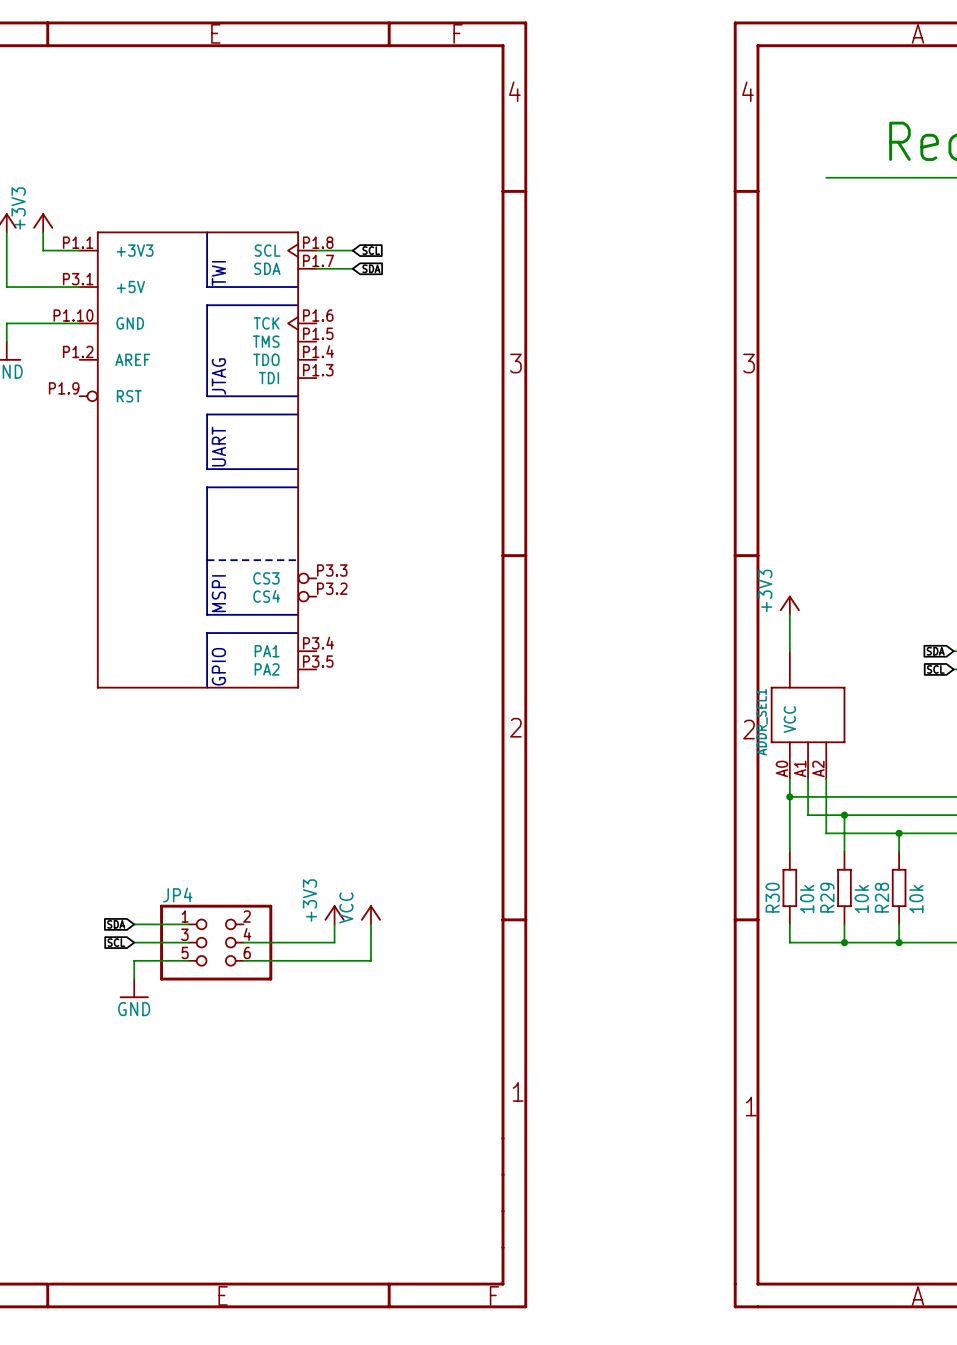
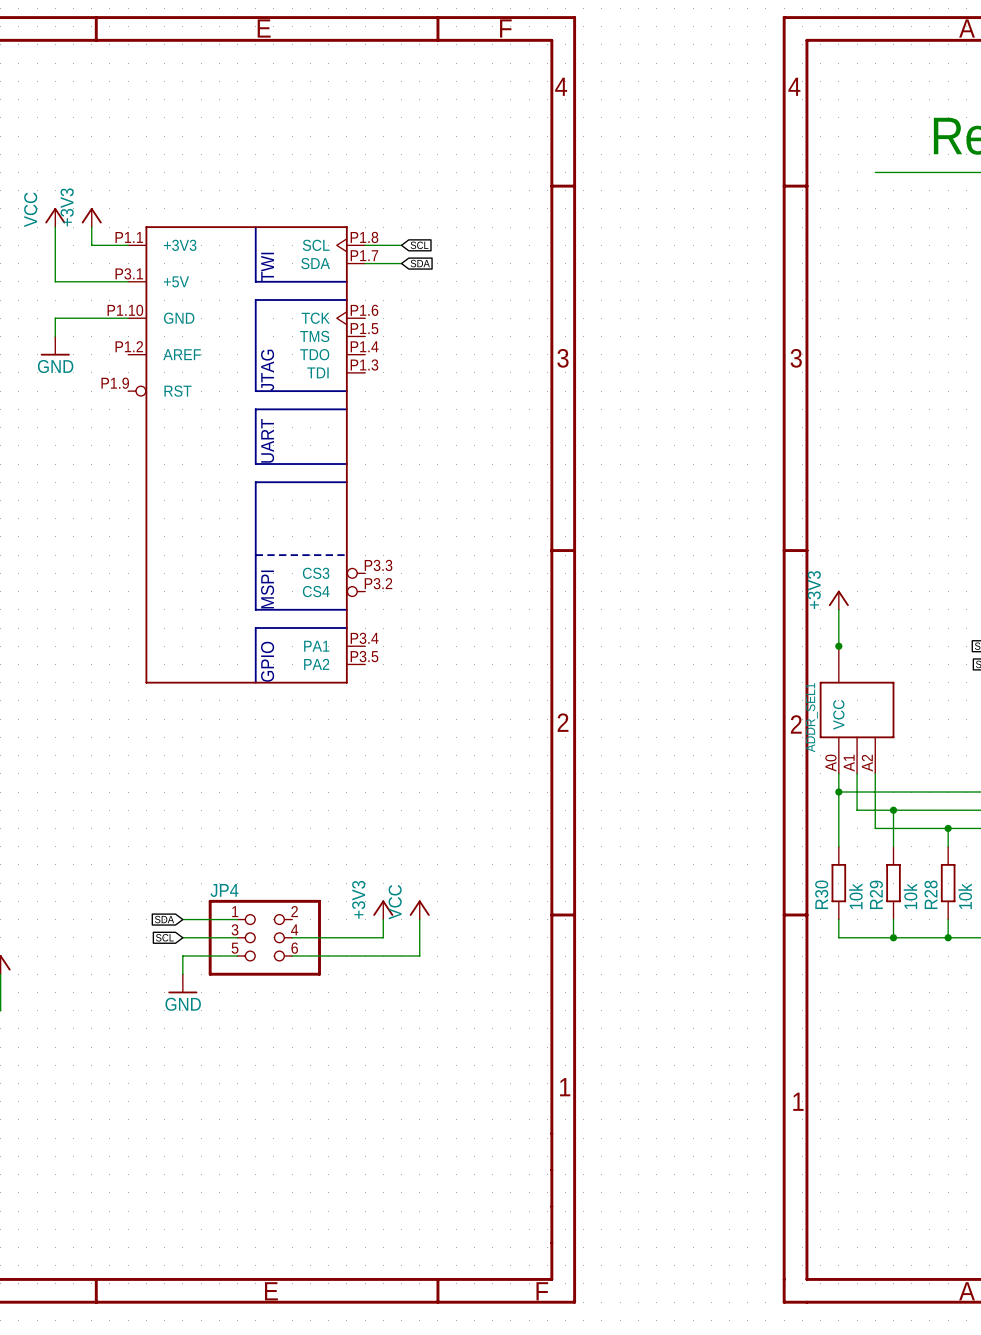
junction: none -> (838, 646)

